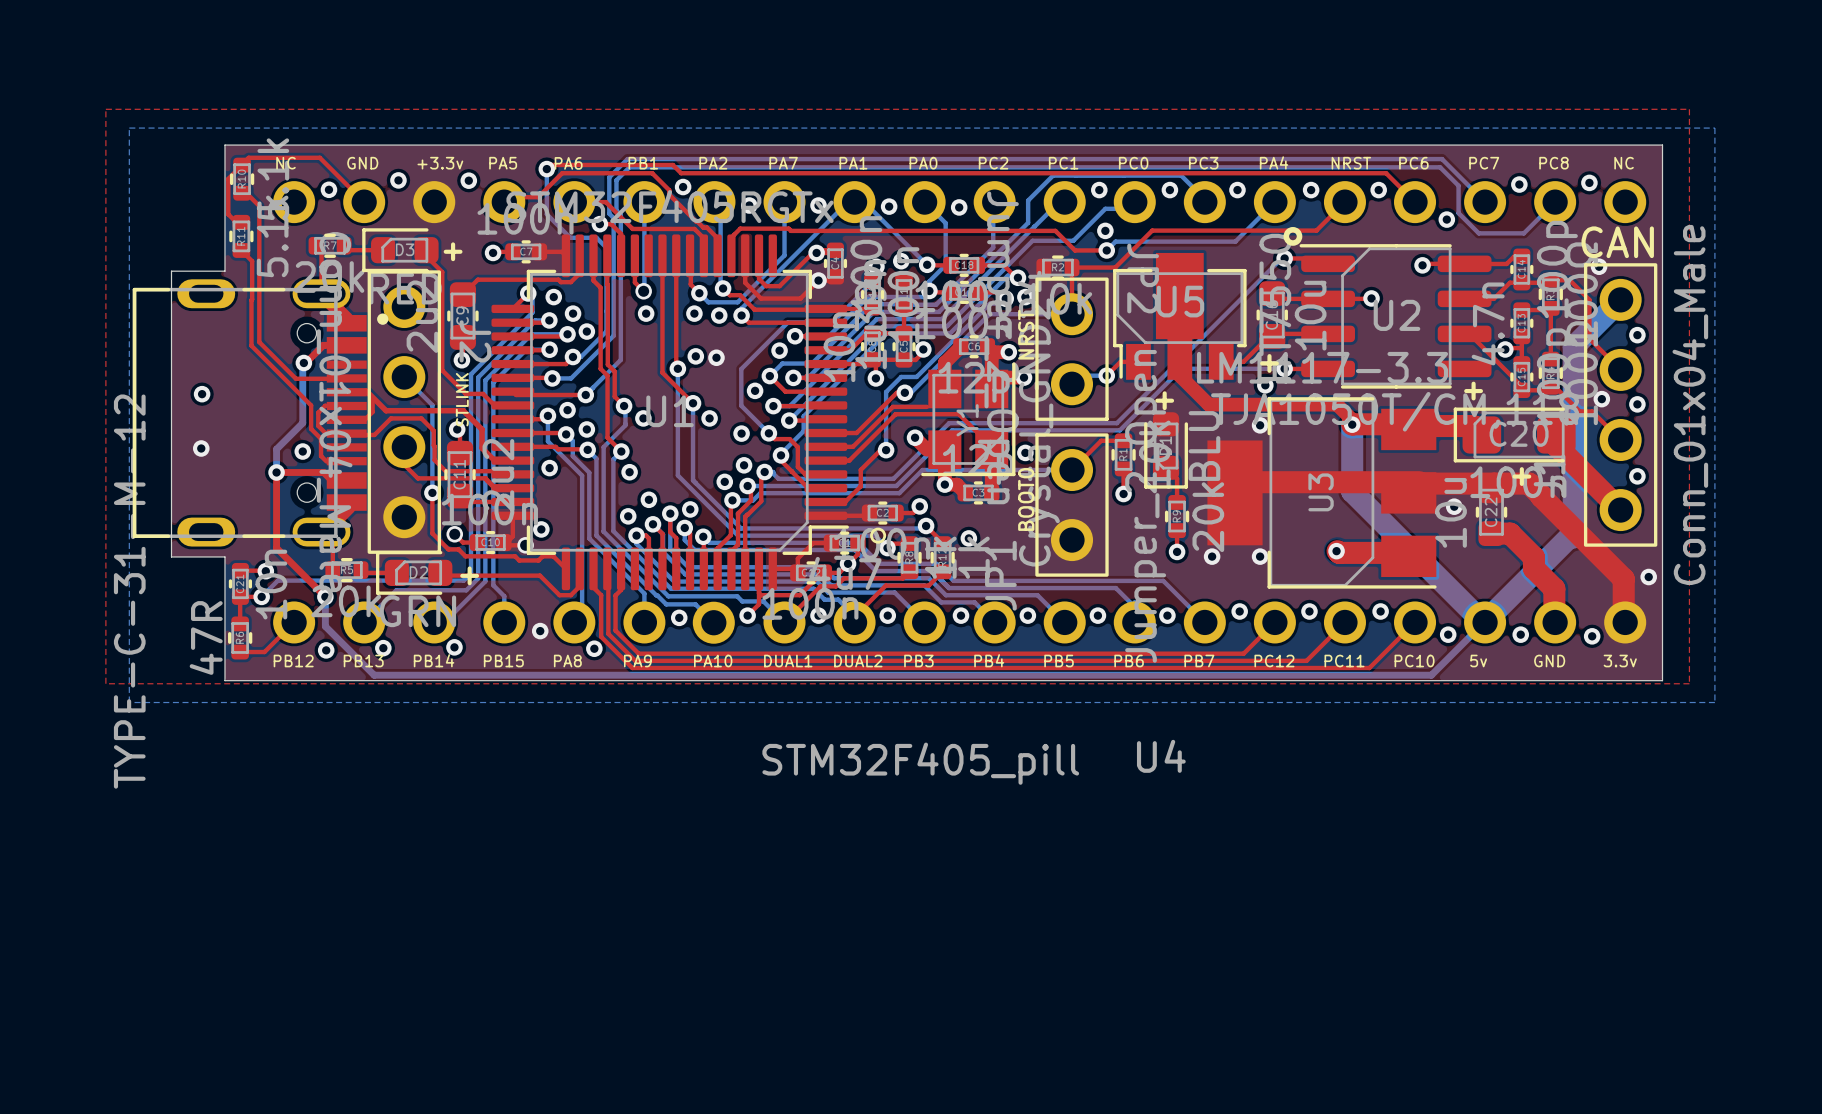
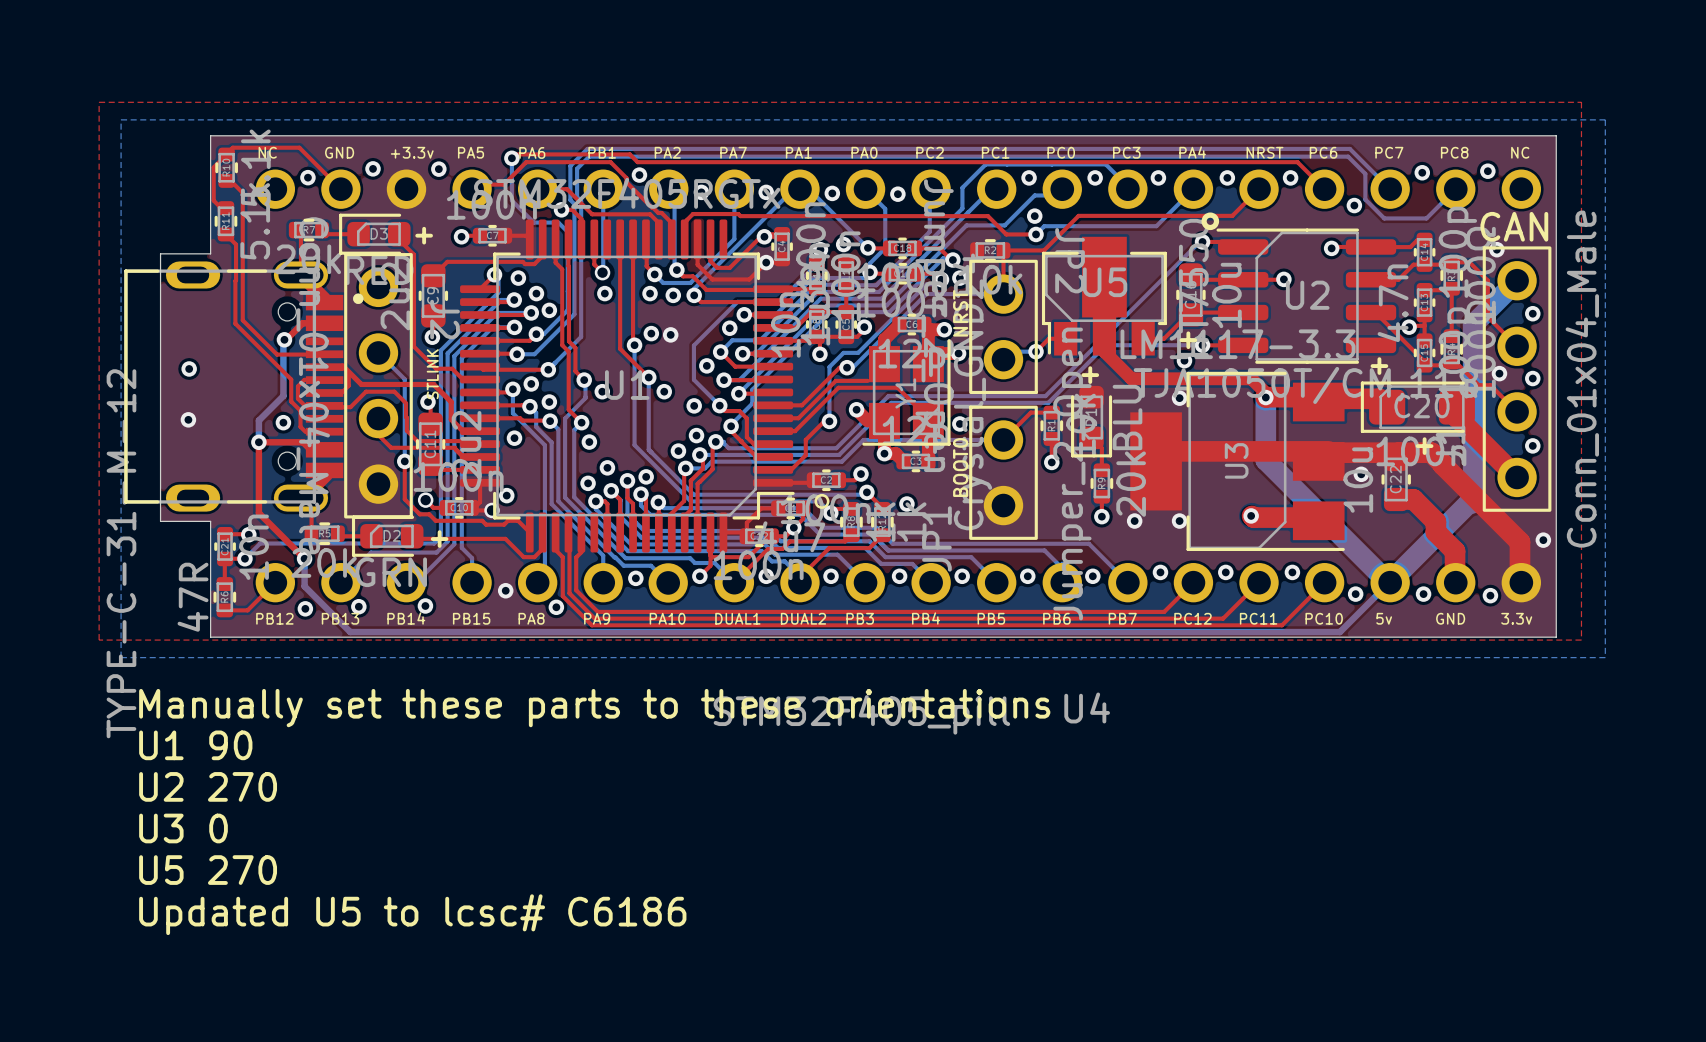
text: none -> Manually set these parts to these orientations (594, 708)
text: none -> U1 90 (195, 745)
text: none -> U2 270 (208, 786)
text: none -> U3 0 (183, 828)
text: none -> U5 270 (208, 870)
text: none -> Updated U5 to lcsc# C6186 (412, 914)

